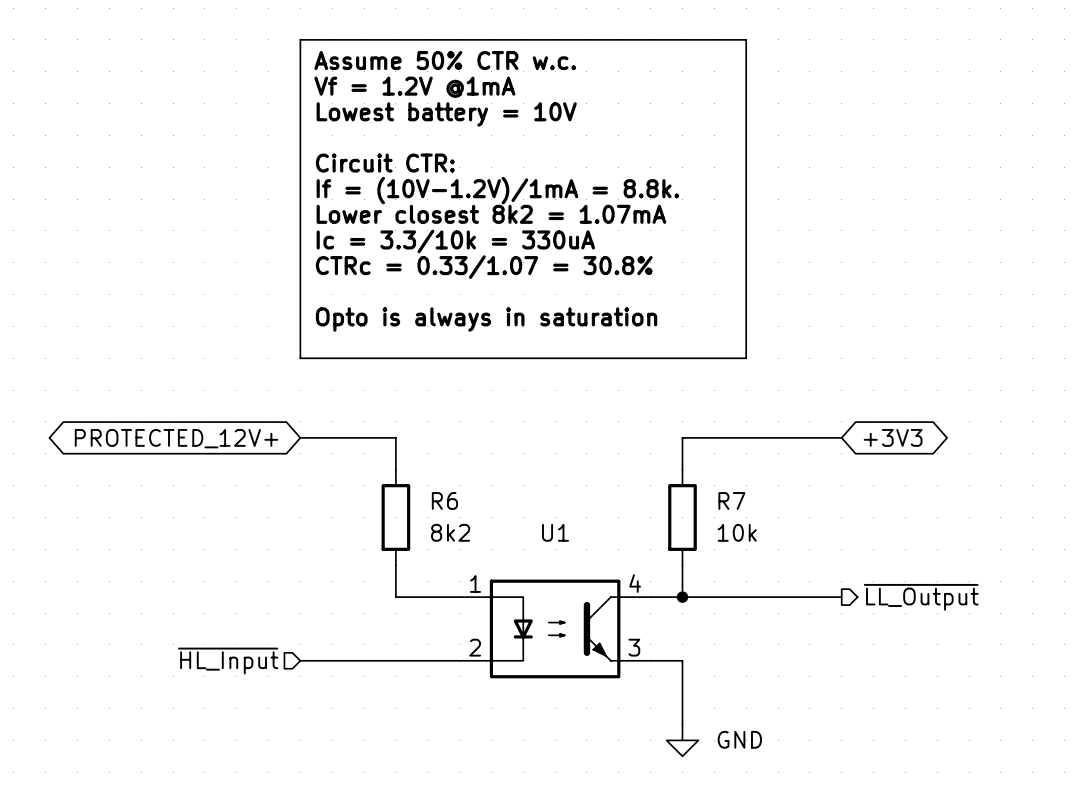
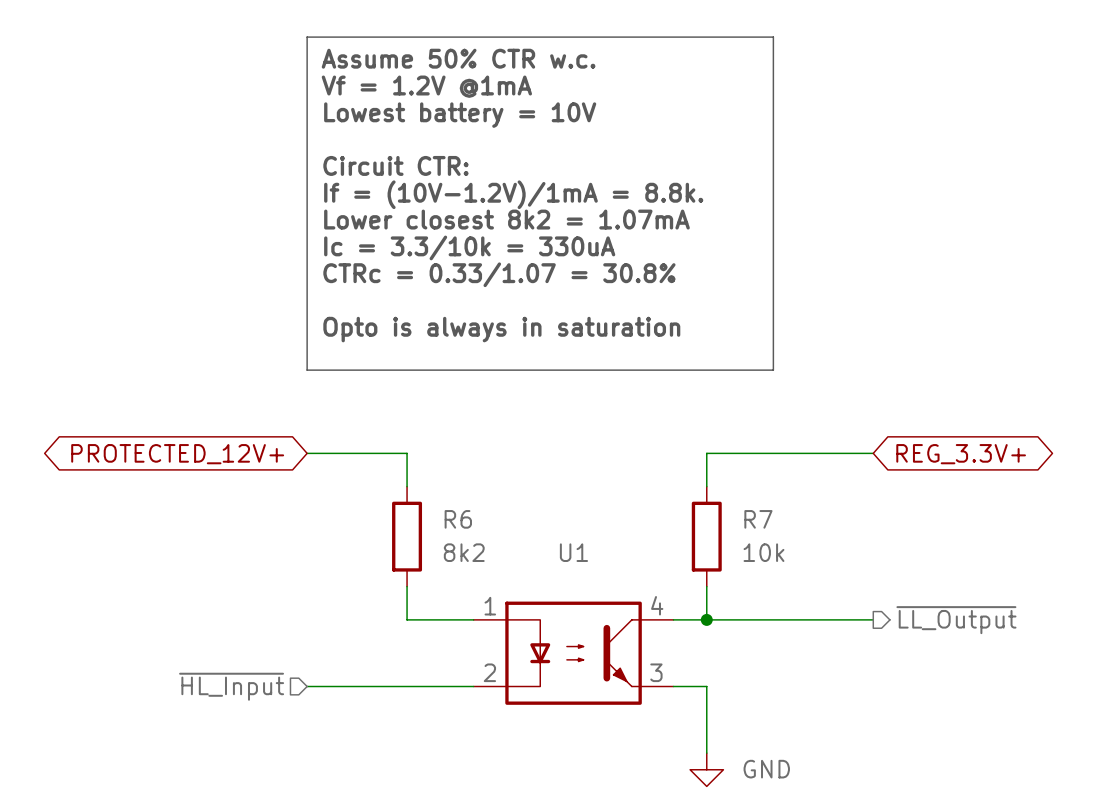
global label: +3V3 (893, 437) -> REG_3.3V+ (961, 454)

